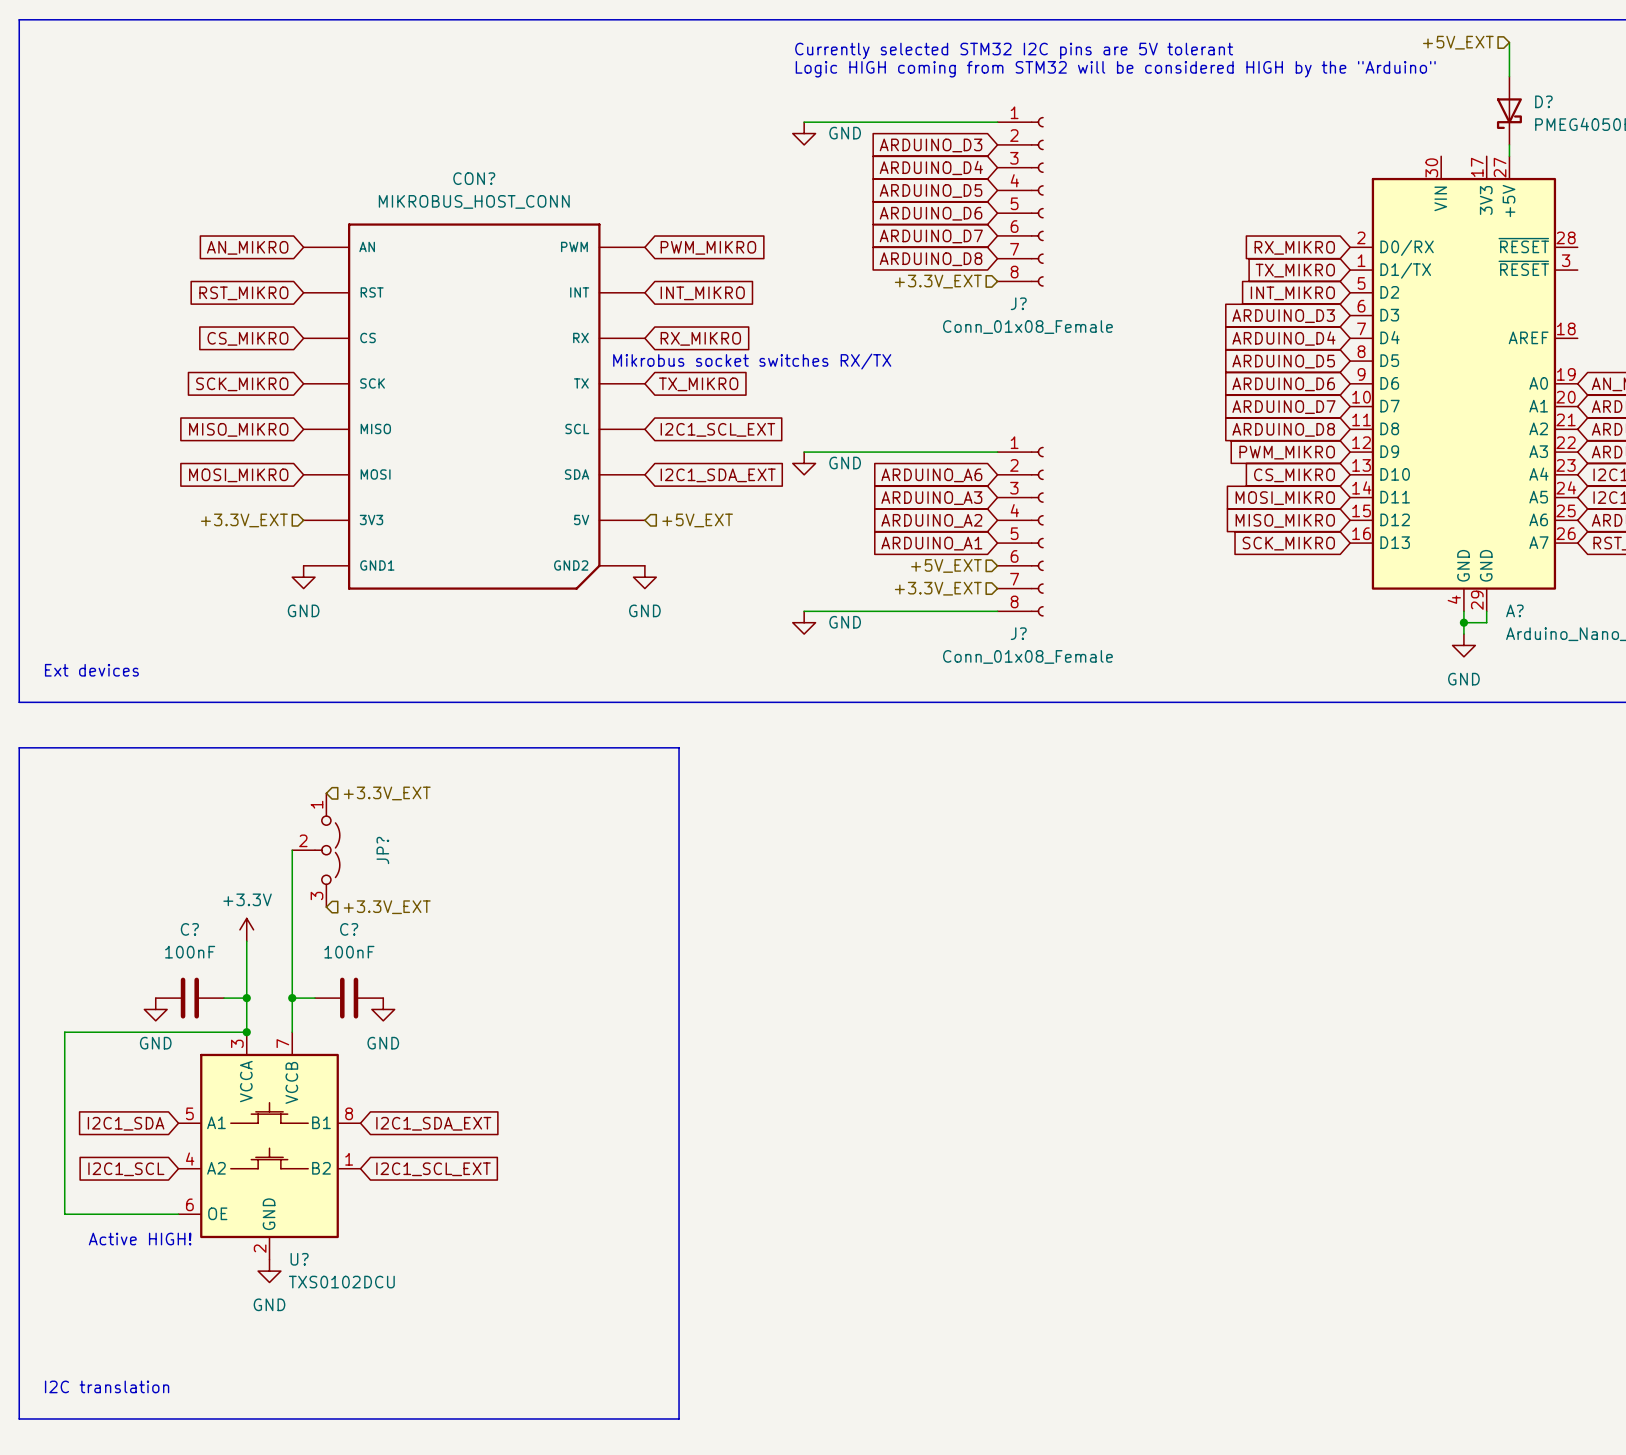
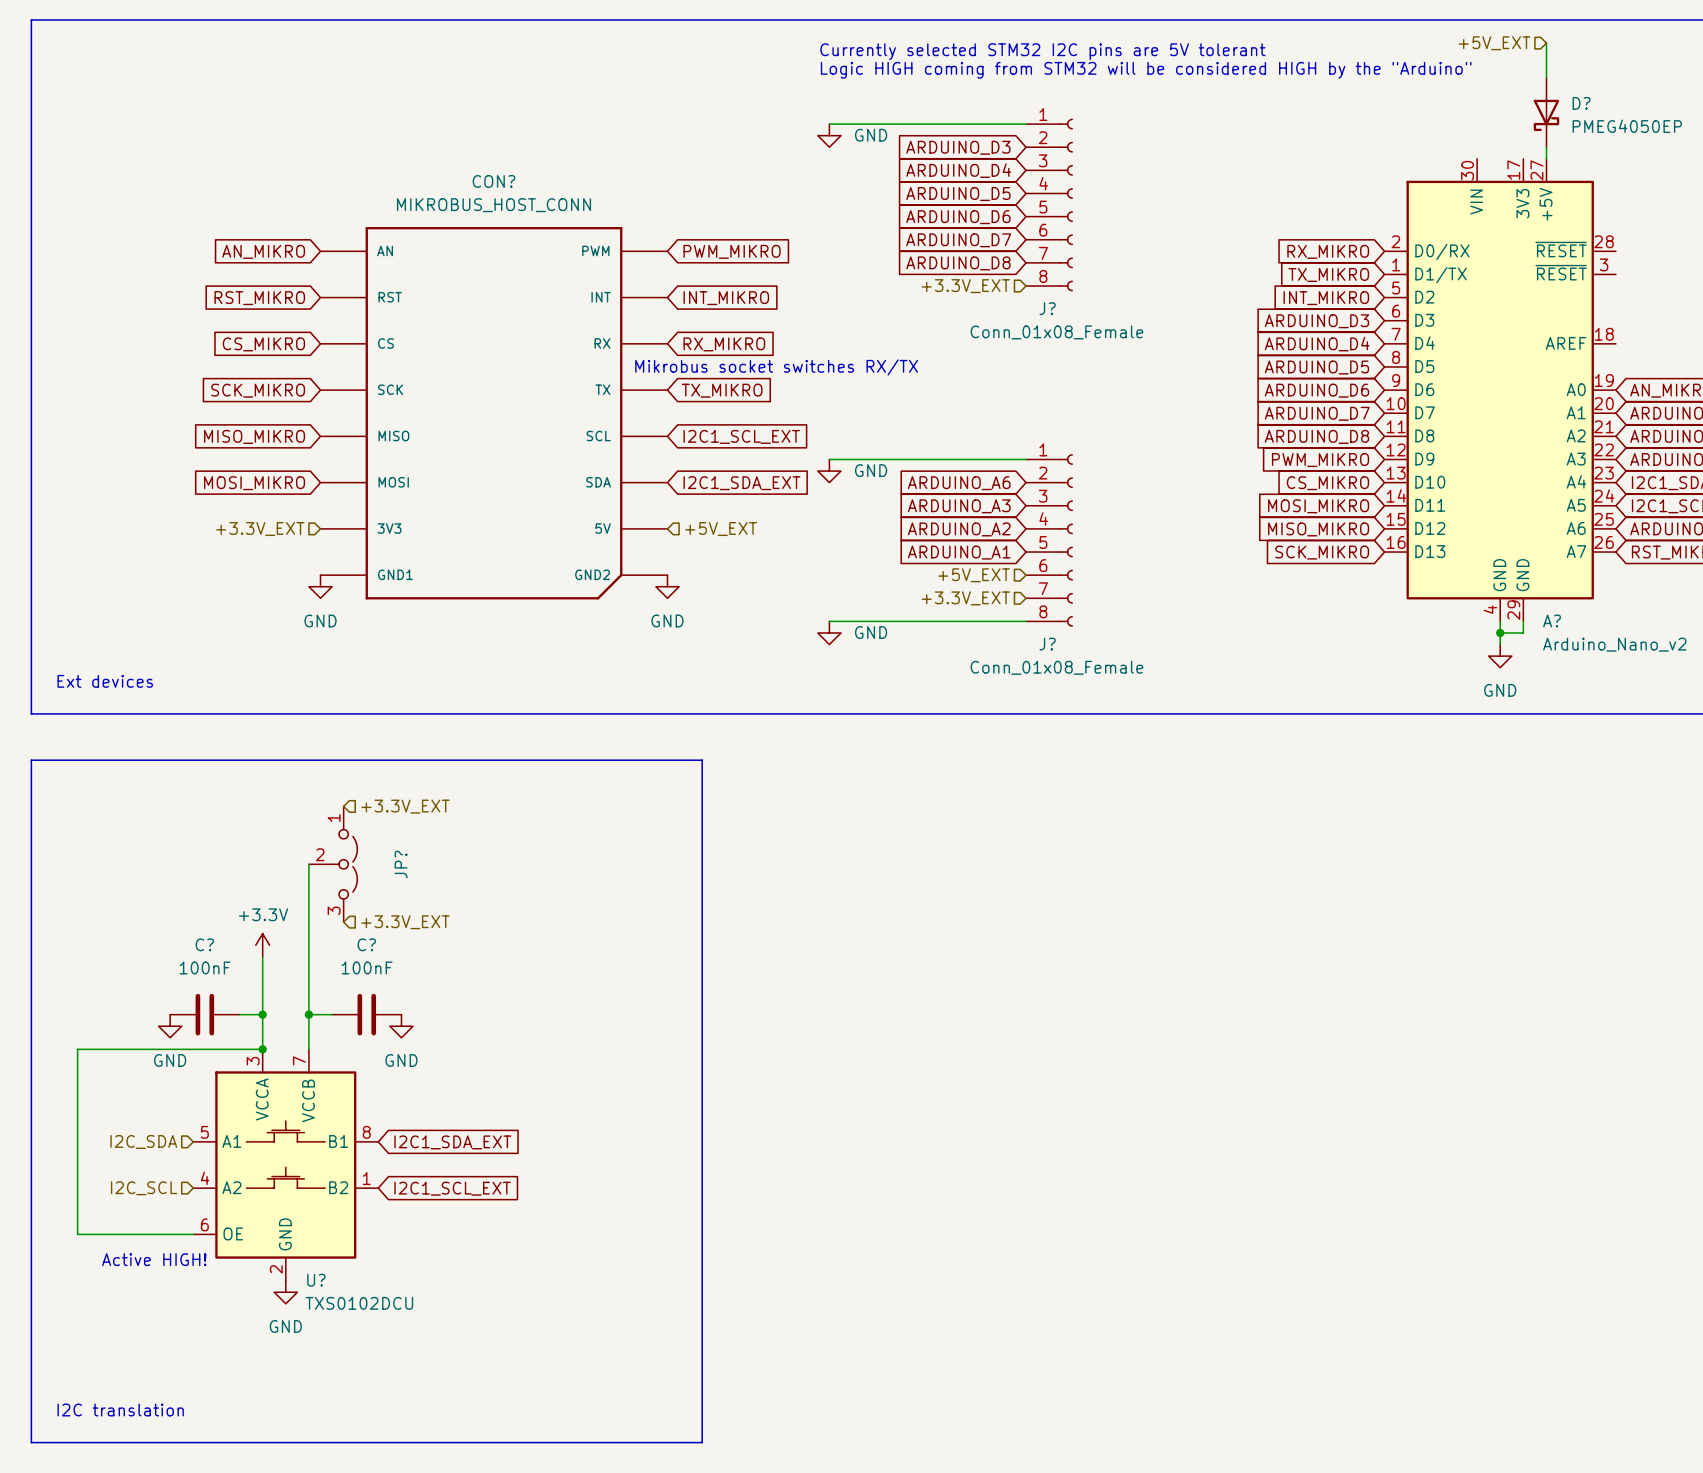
global label: I2C1_SDA (126, 1123) -> none
hierarchical label: none -> I2C_SDA (143, 1142)
hierarchical label: none -> I2C_SCL (144, 1188)
global label: I2C1_SCL (126, 1169) -> none

